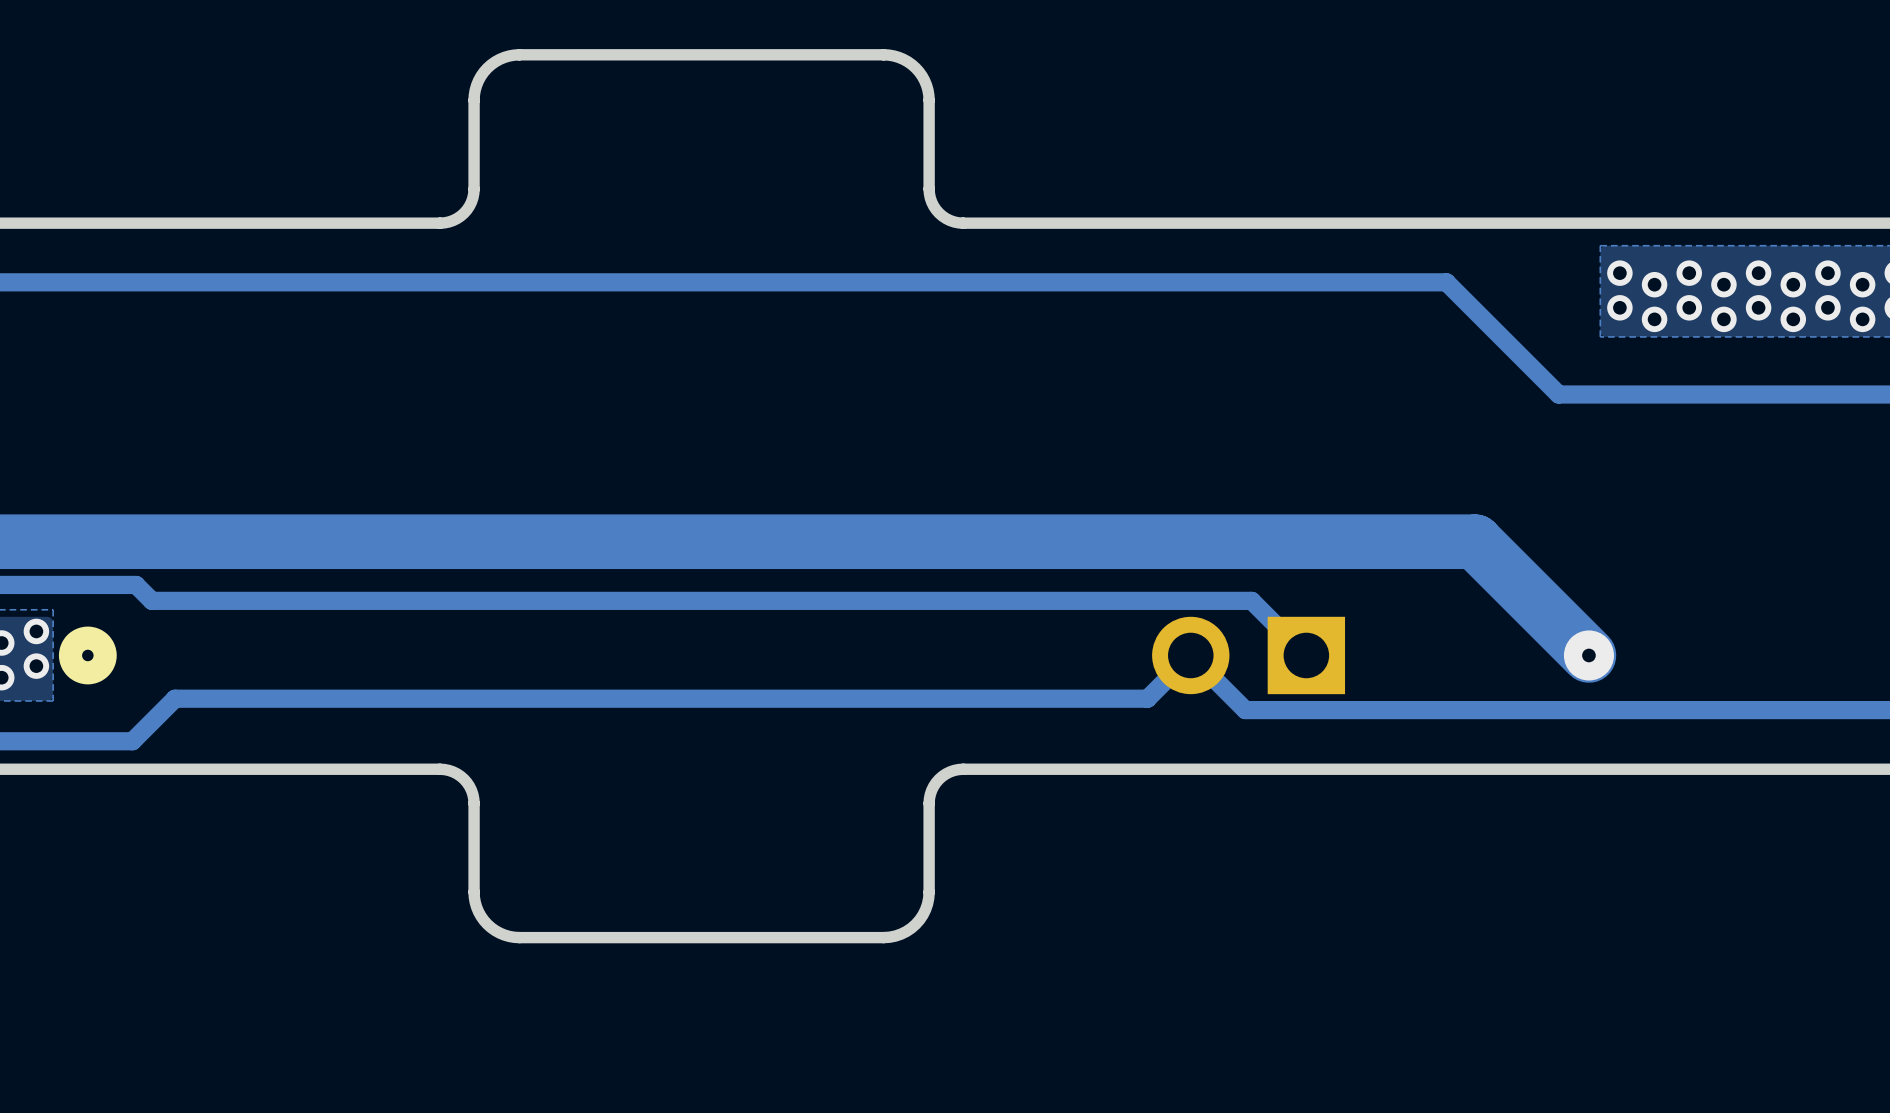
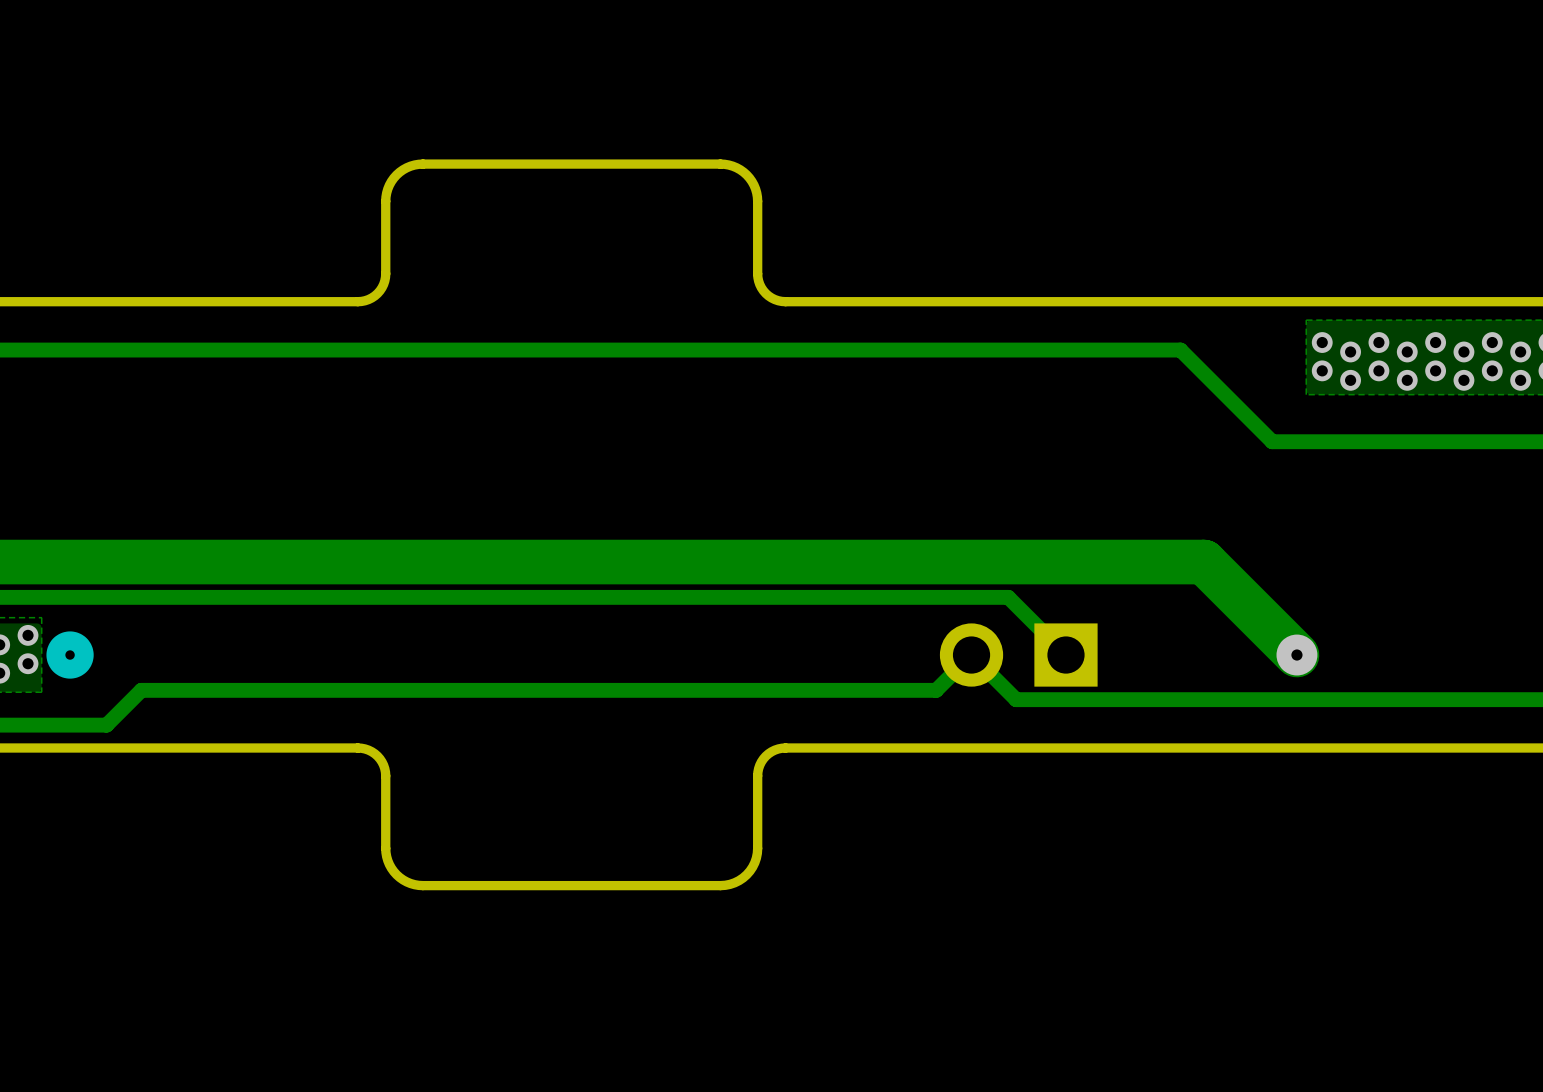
track: (136, 584) (151, 600) (1251, 600) -> (109, 597) (1008, 597) (1021, 610)

